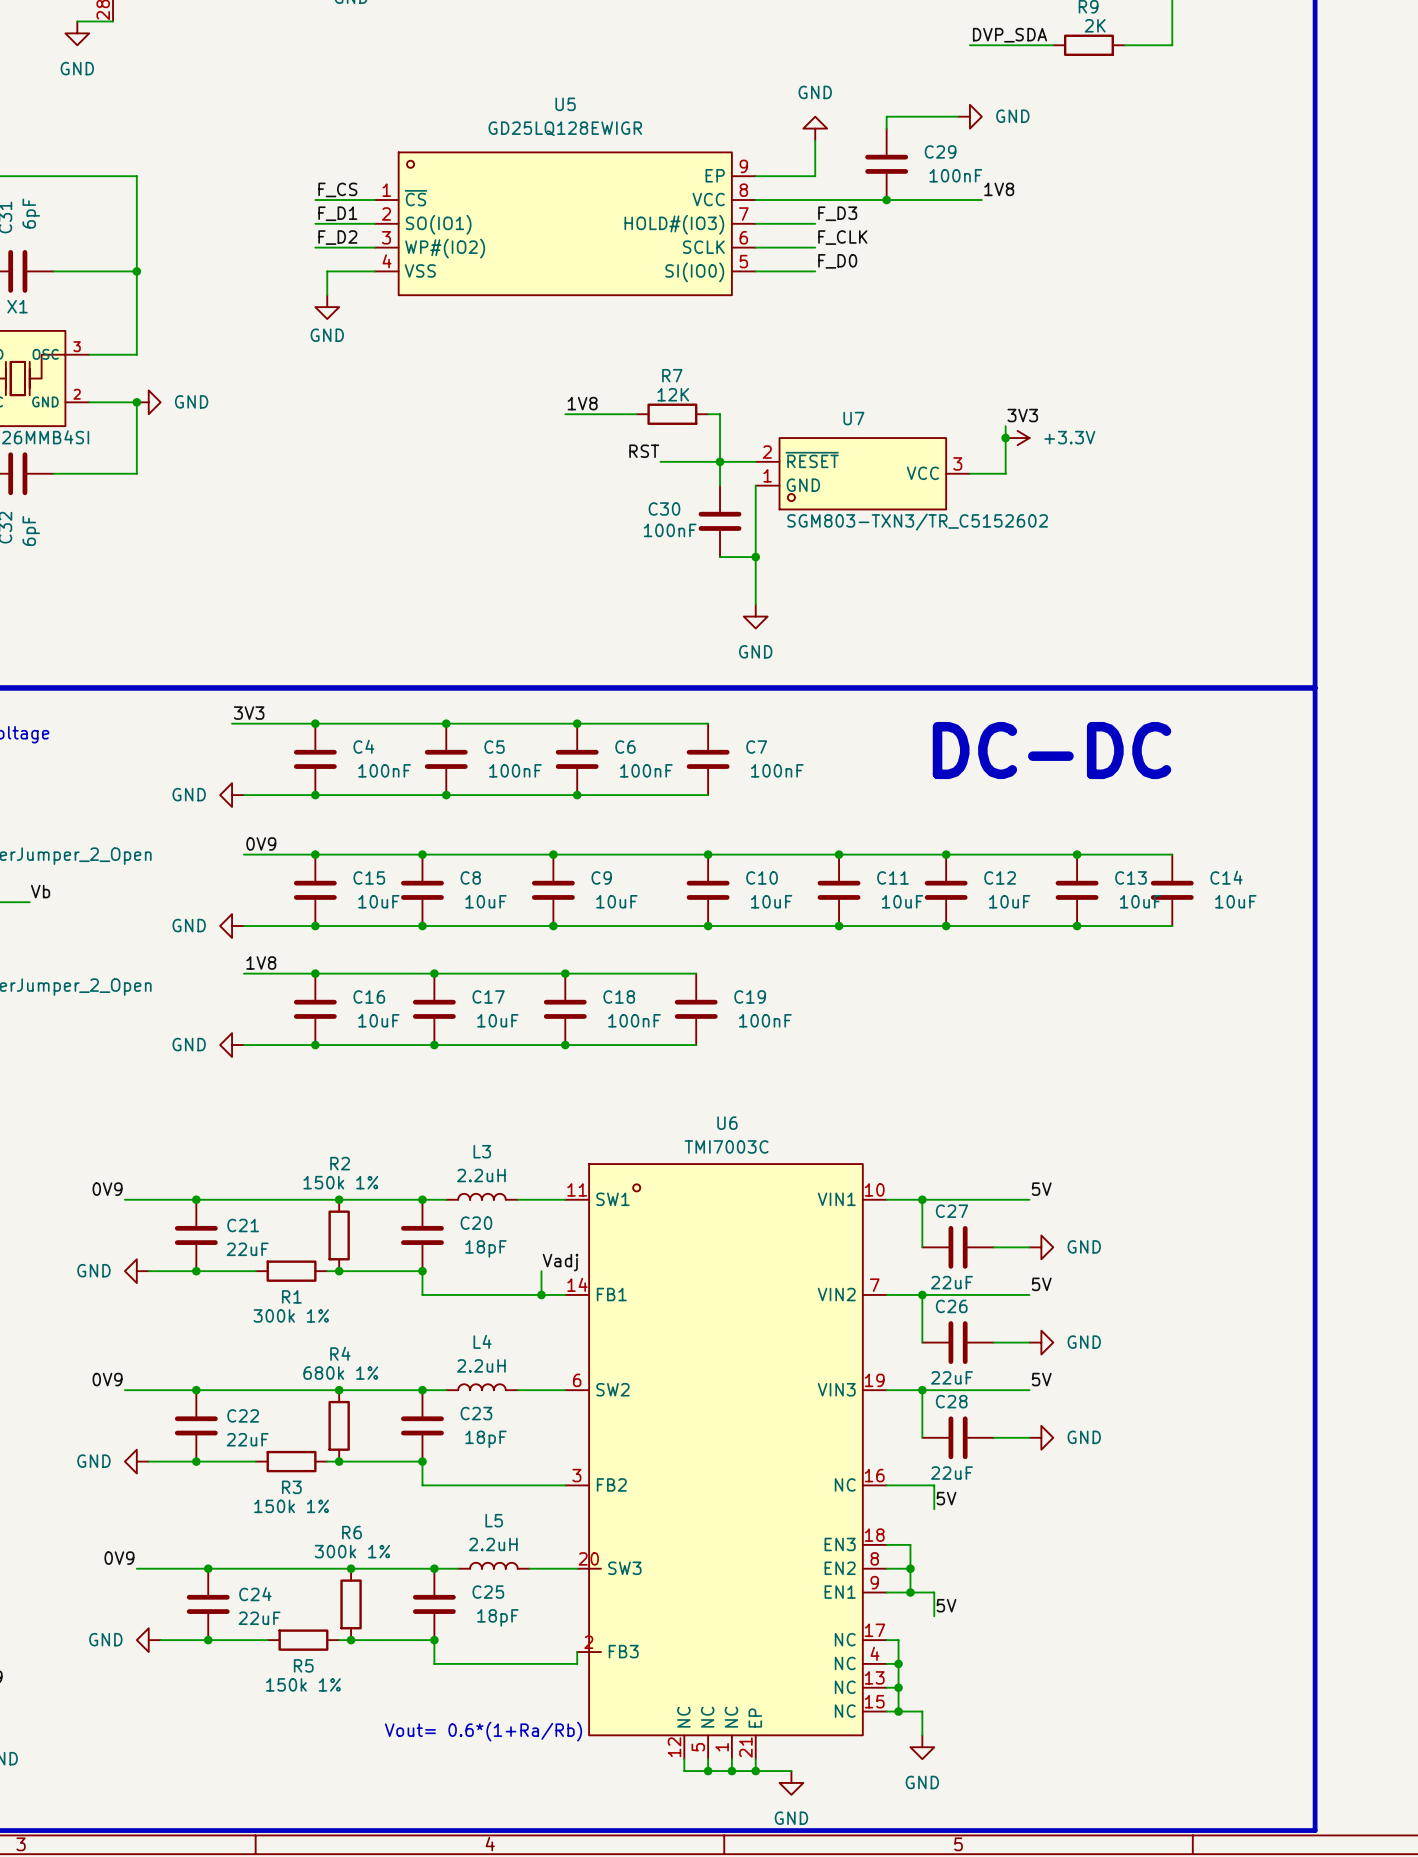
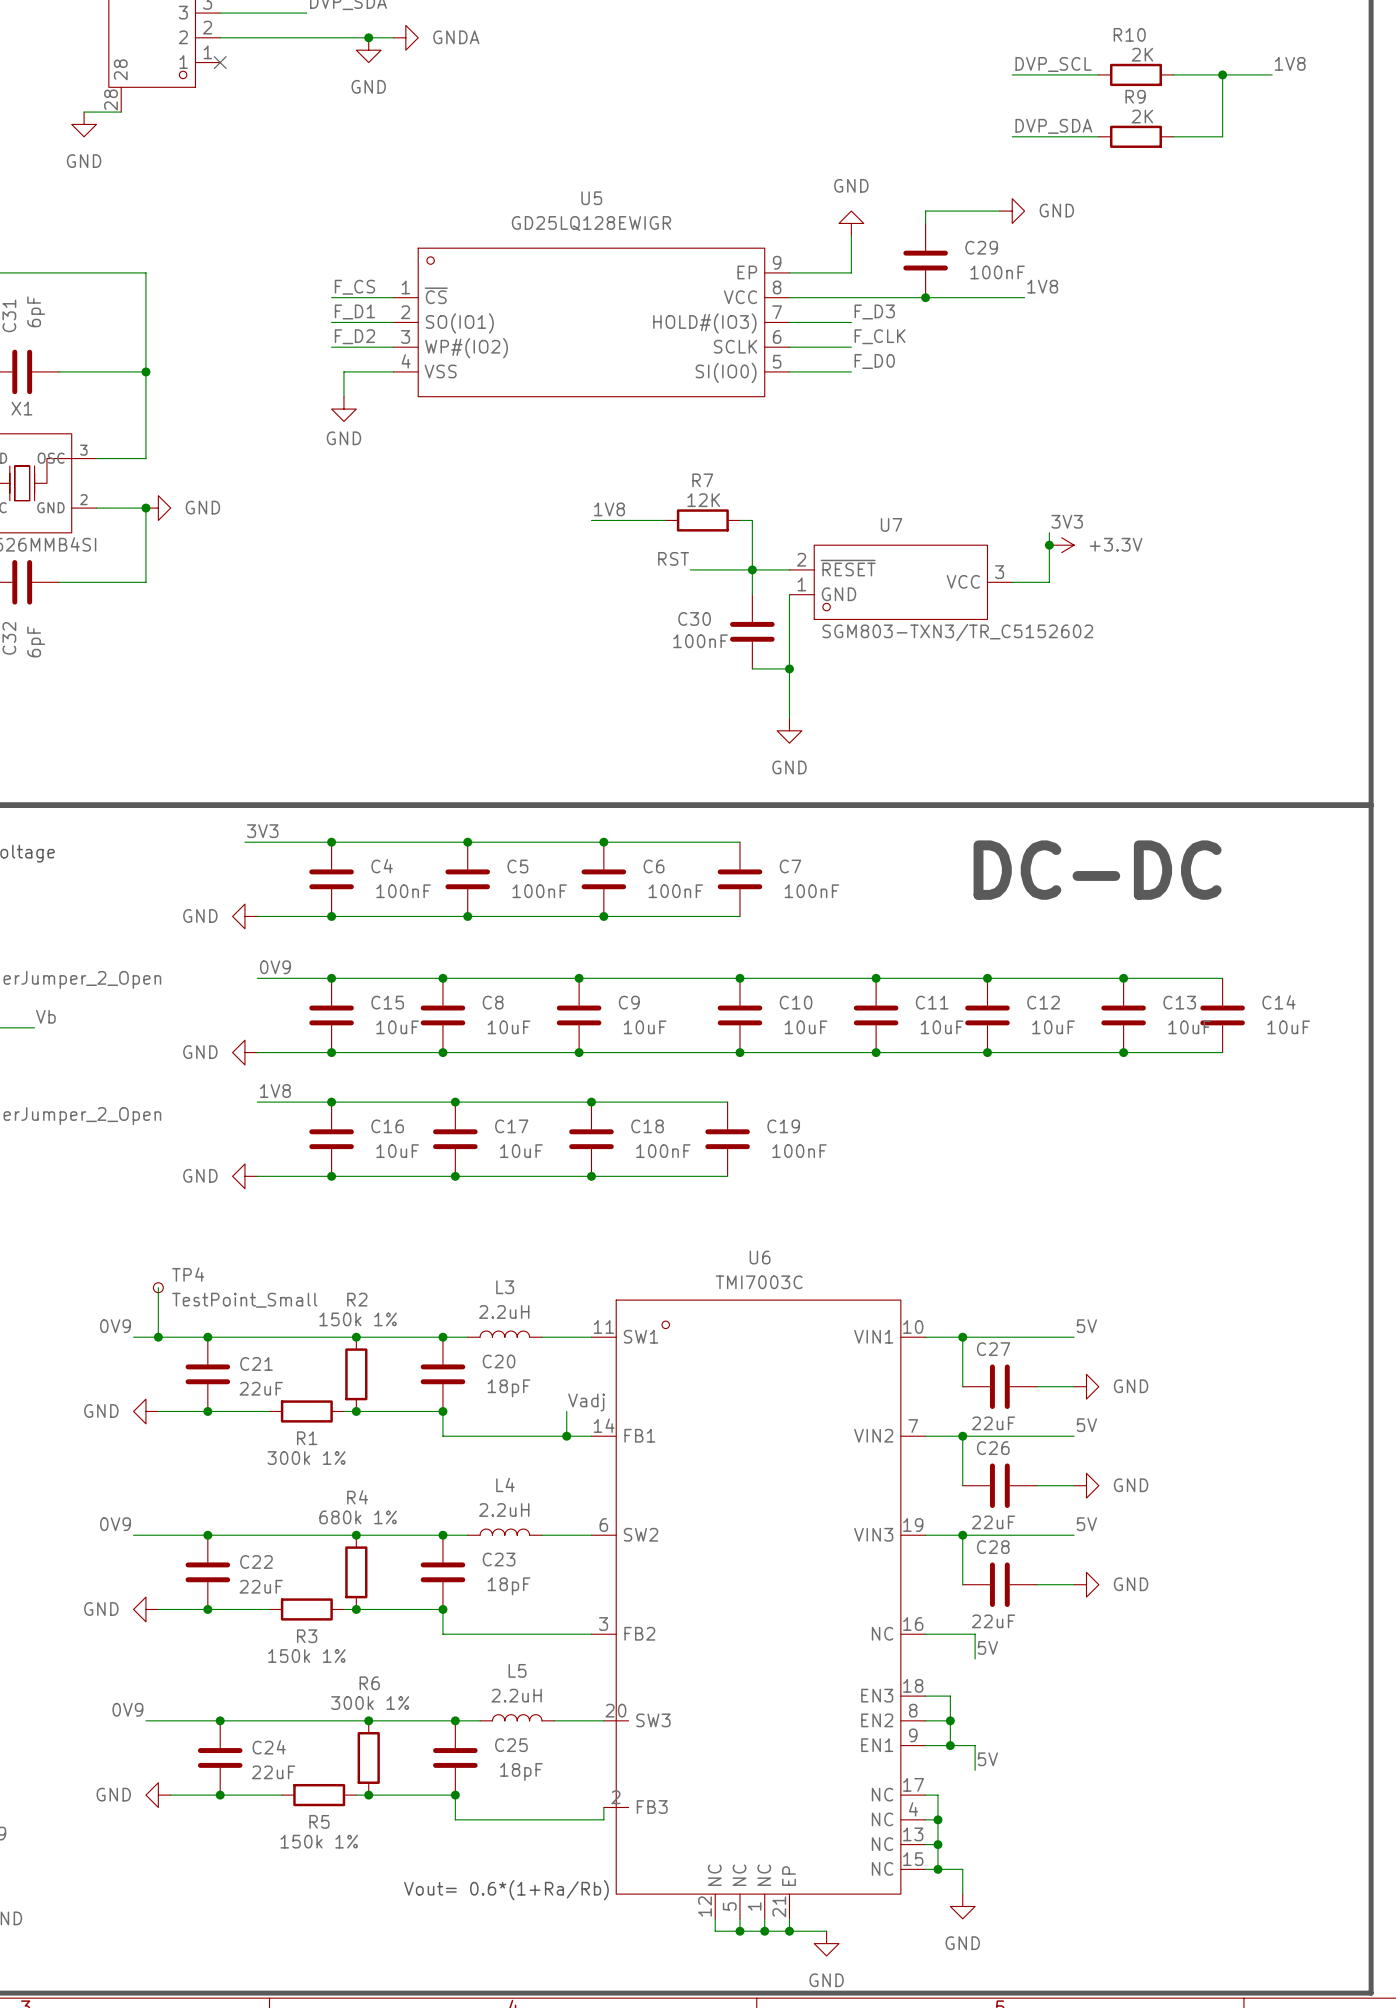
wire: none -> (158, 1287) (158, 1337)
TP4: none -> TestPoint_Small (158, 1287)
junction: none -> (158, 1337)

